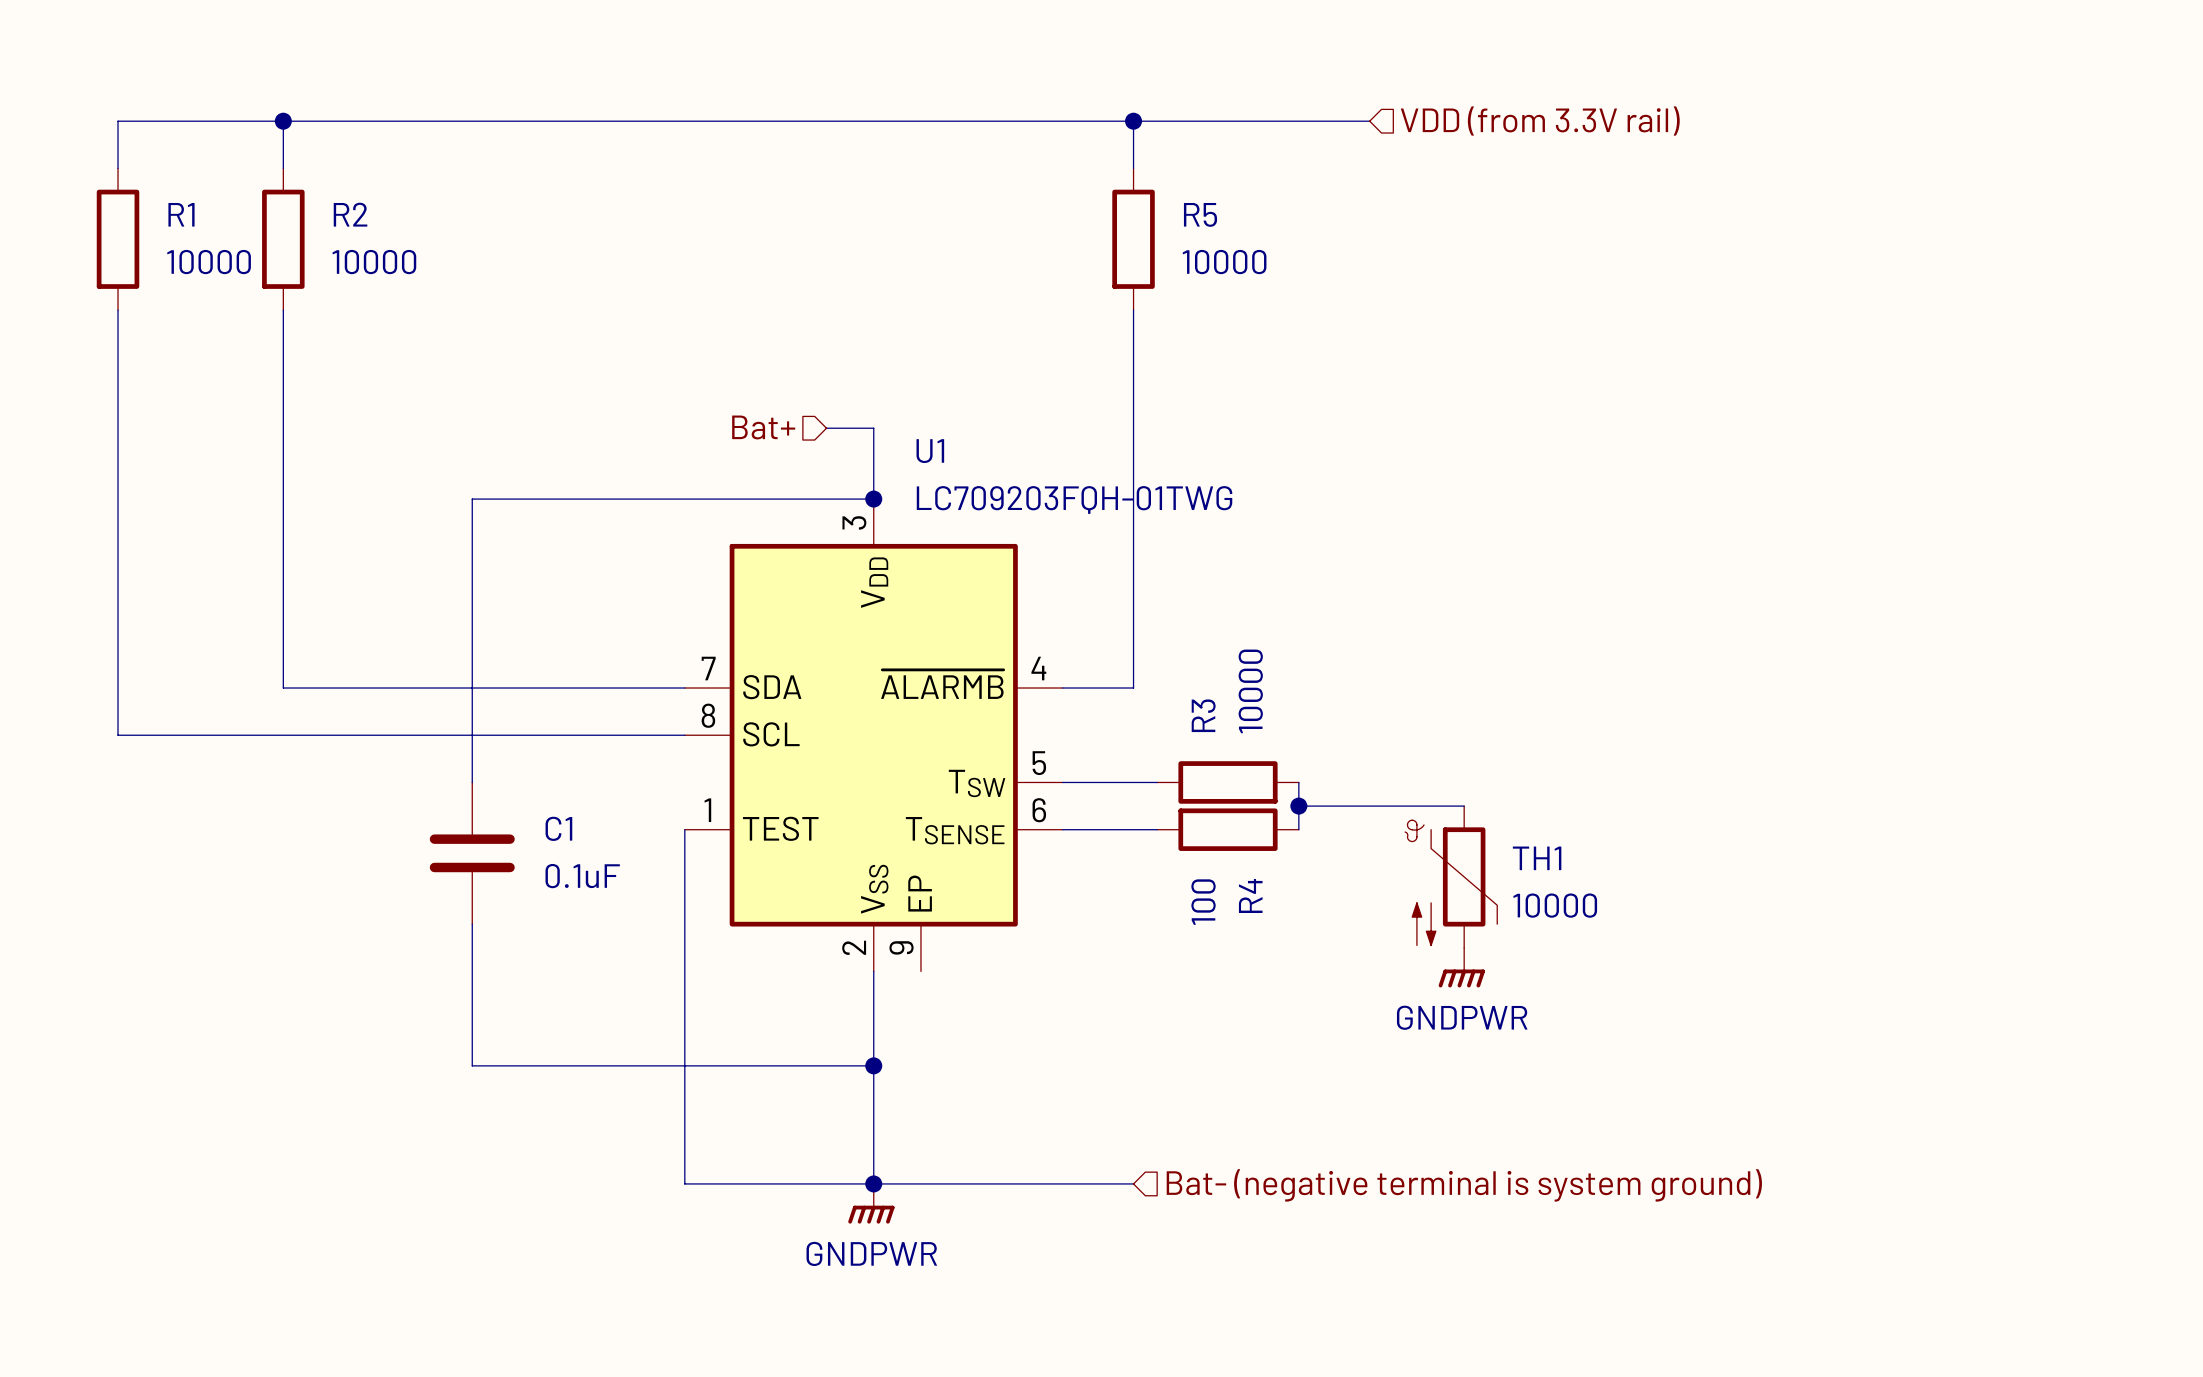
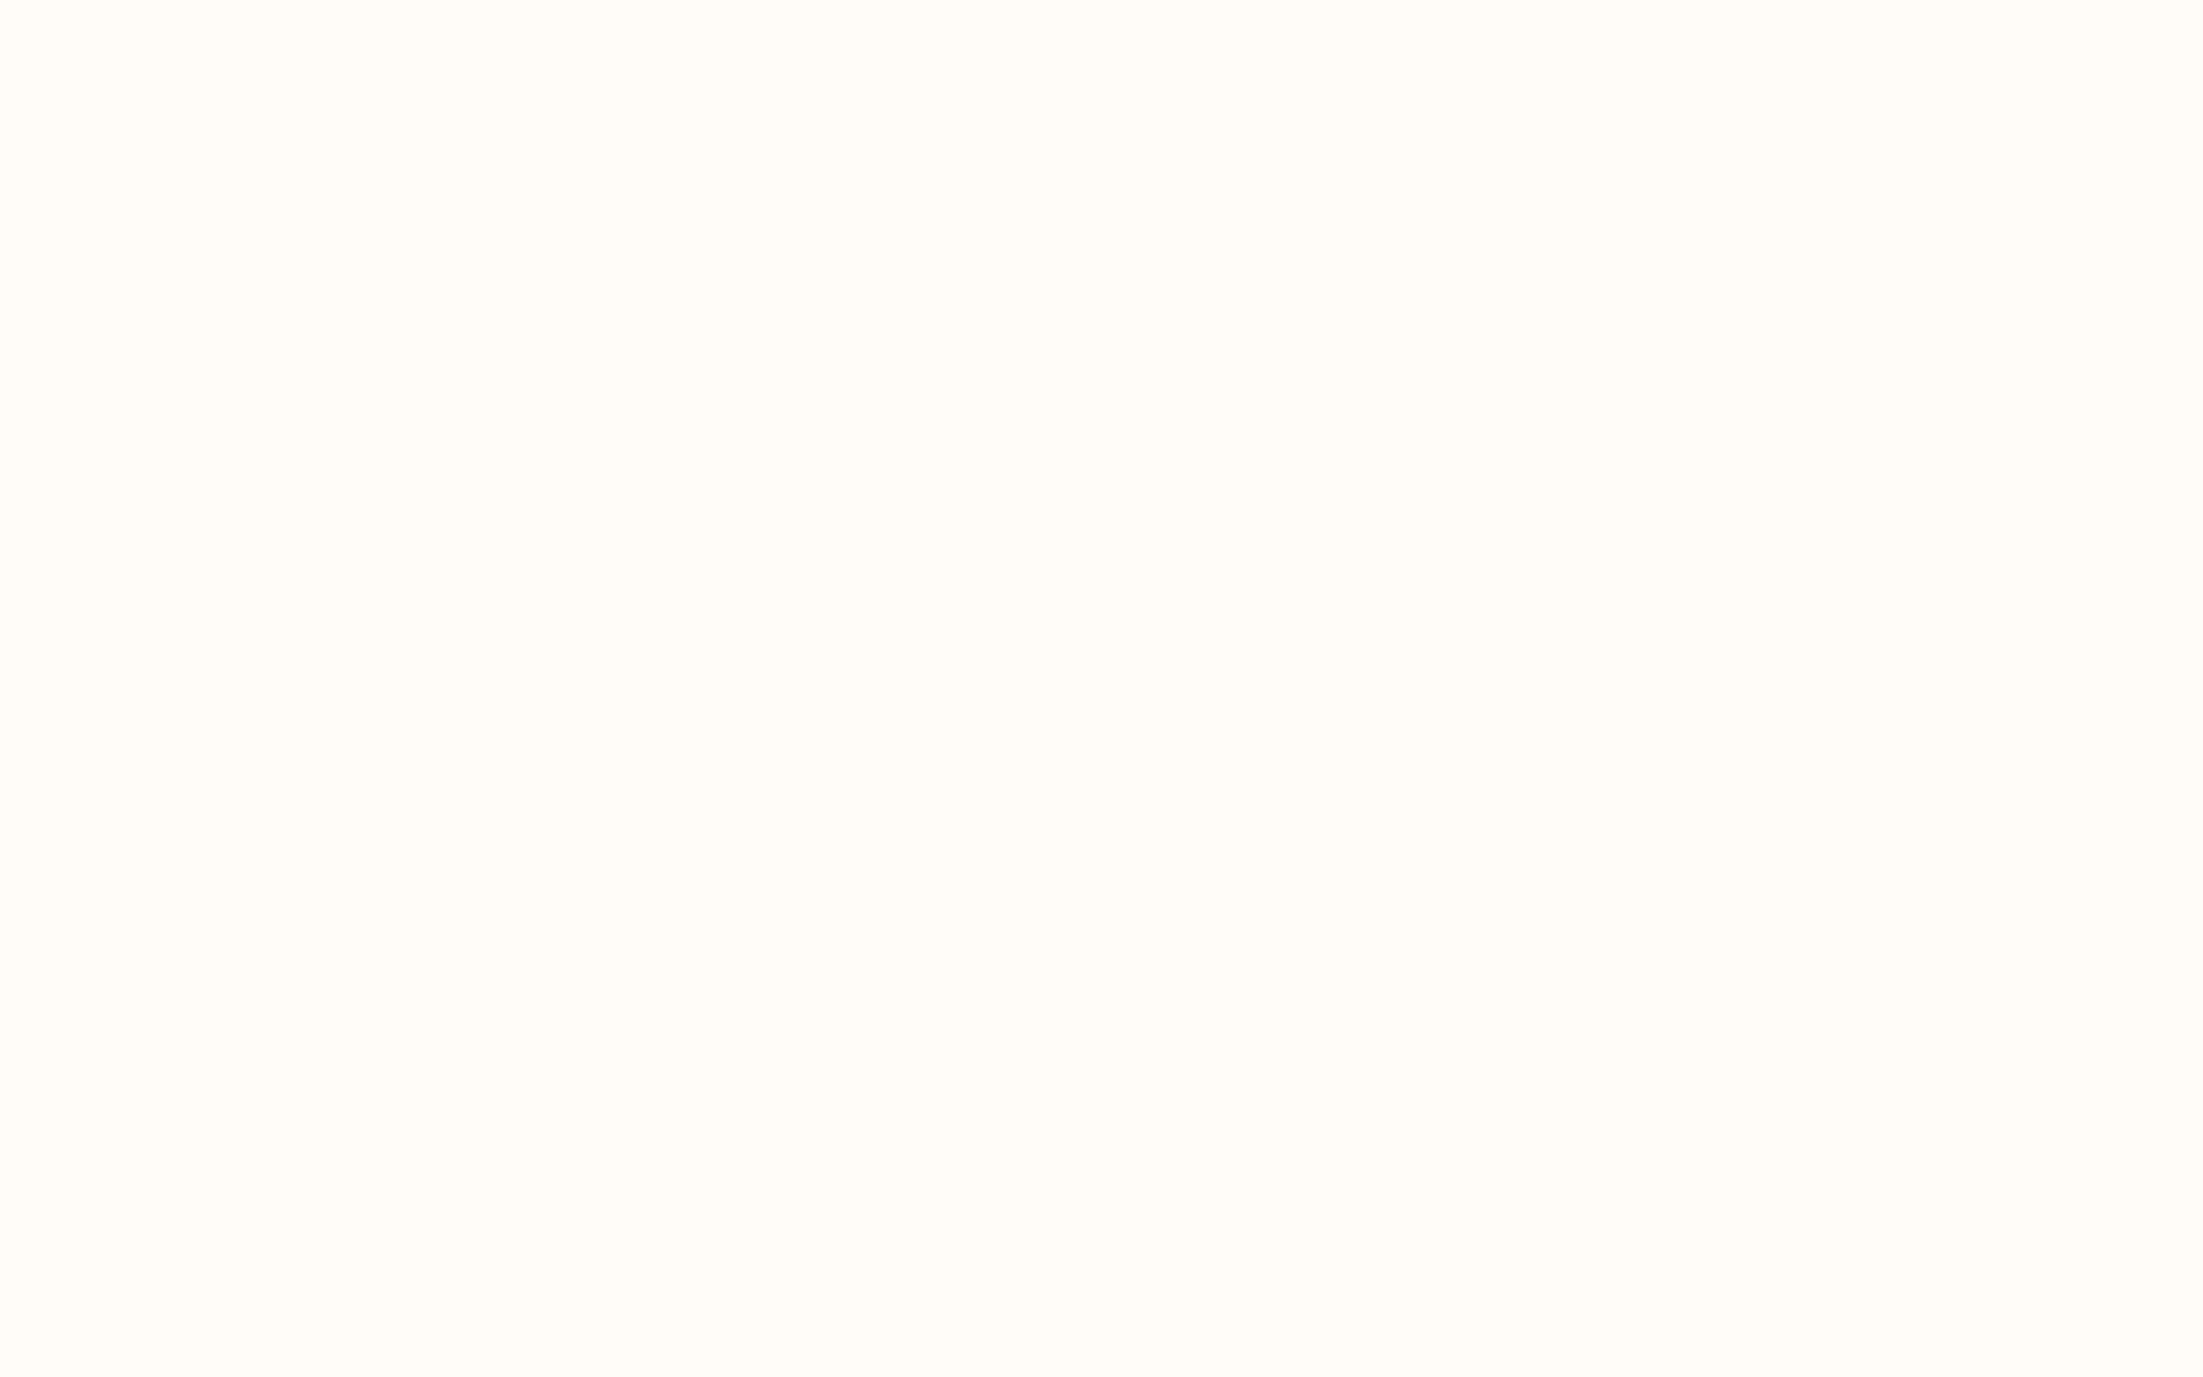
wire: (283, 121) (283, 168) -> none
junction: (283, 121) -> none
wire: (1133, 121) (1133, 168) -> none
junction: (1133, 121) -> none
wire: (1369, 121) (118, 121) (118, 168) -> none
hierarchical label: VDD (from 3.3V rail) (1540, 121) -> none
R1: 10000 (118, 239) -> none
R2: 10000 (283, 239) -> none
R5: 10000 (1133, 239) -> none
wire: (118, 310) (118, 735) (684, 735) -> none
wire: (283, 310) (283, 688) (684, 688) -> none
wire: (1133, 310) (1133, 688) (1062, 688) -> none
hierarchical label: Bat+ (763, 427) -> none
wire: (826, 428) (873, 428) (873, 499) (472, 499) (472, 782) -> none
junction: (873, 499) -> none
U1: LC709203FQH-01TWG (873, 735) -> none
wire: (1062, 782) (1157, 782) -> none
R3: 10000 (1228, 782) -> none
wire: (1298, 782) (1298, 829) -> none
wire: (1298, 806) (1464, 806) -> none
junction: (1298, 806) -> none
wire: (684, 829) (684, 1183) (1133, 1183) -> none
wire: (1062, 829) (1157, 829) -> none
R4: 100 (1228, 829) -> none
C1: 0.1uF (472, 853) -> none
TH1: 10000 (1451, 876) -> none
wire: (472, 924) (472, 1065) (873, 1065) -> none
power symbol: GNDPWR (1461, 967) -> none
wire: (873, 971) (873, 1183) -> none
junction: (873, 1065) -> none
junction: (873, 1183) -> none
hierarchical label: Bat- (negative terminal is system ground) (1464, 1185) -> none
power symbol: GNDPWR (871, 1203) -> none

